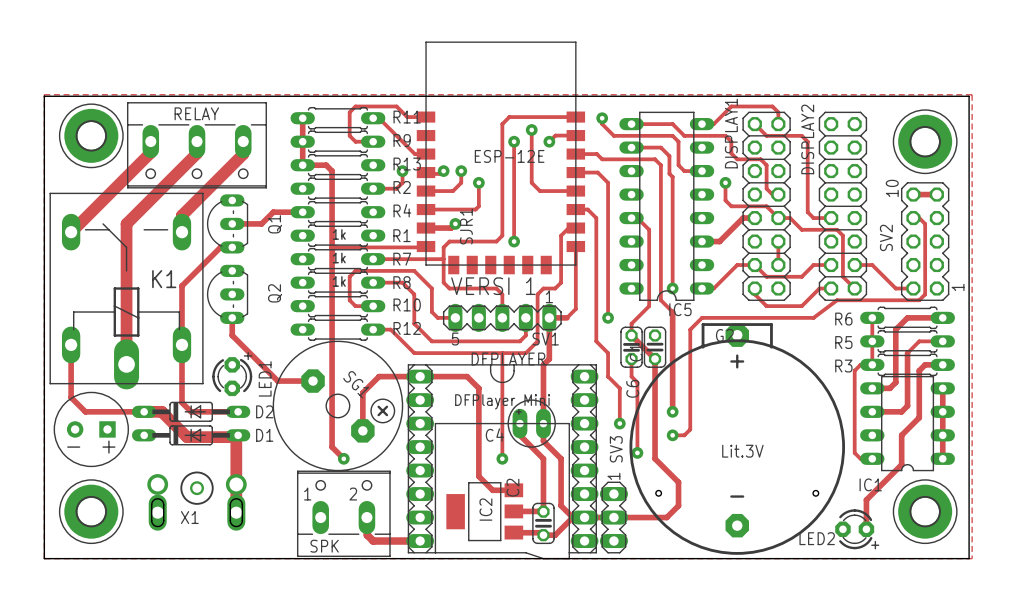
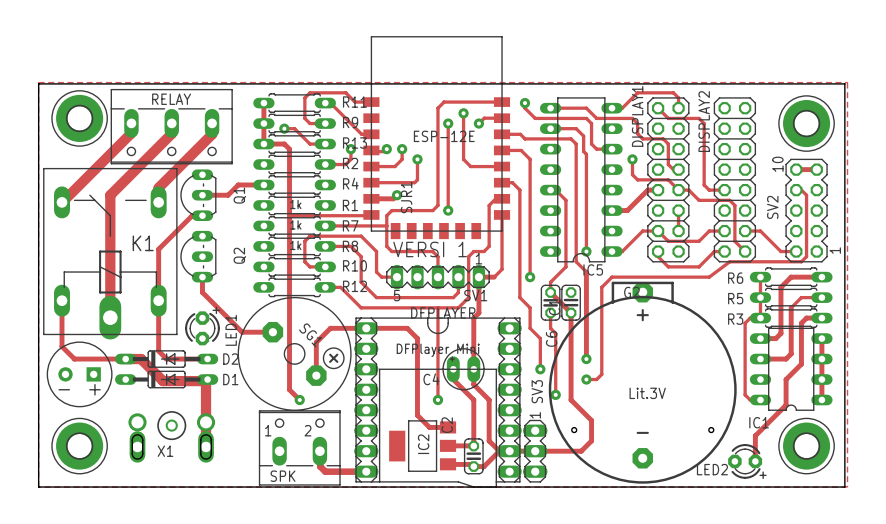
track: none -> (284, 128) (294, 128) (309, 144) (325, 144)
via: none -> (284, 128)

